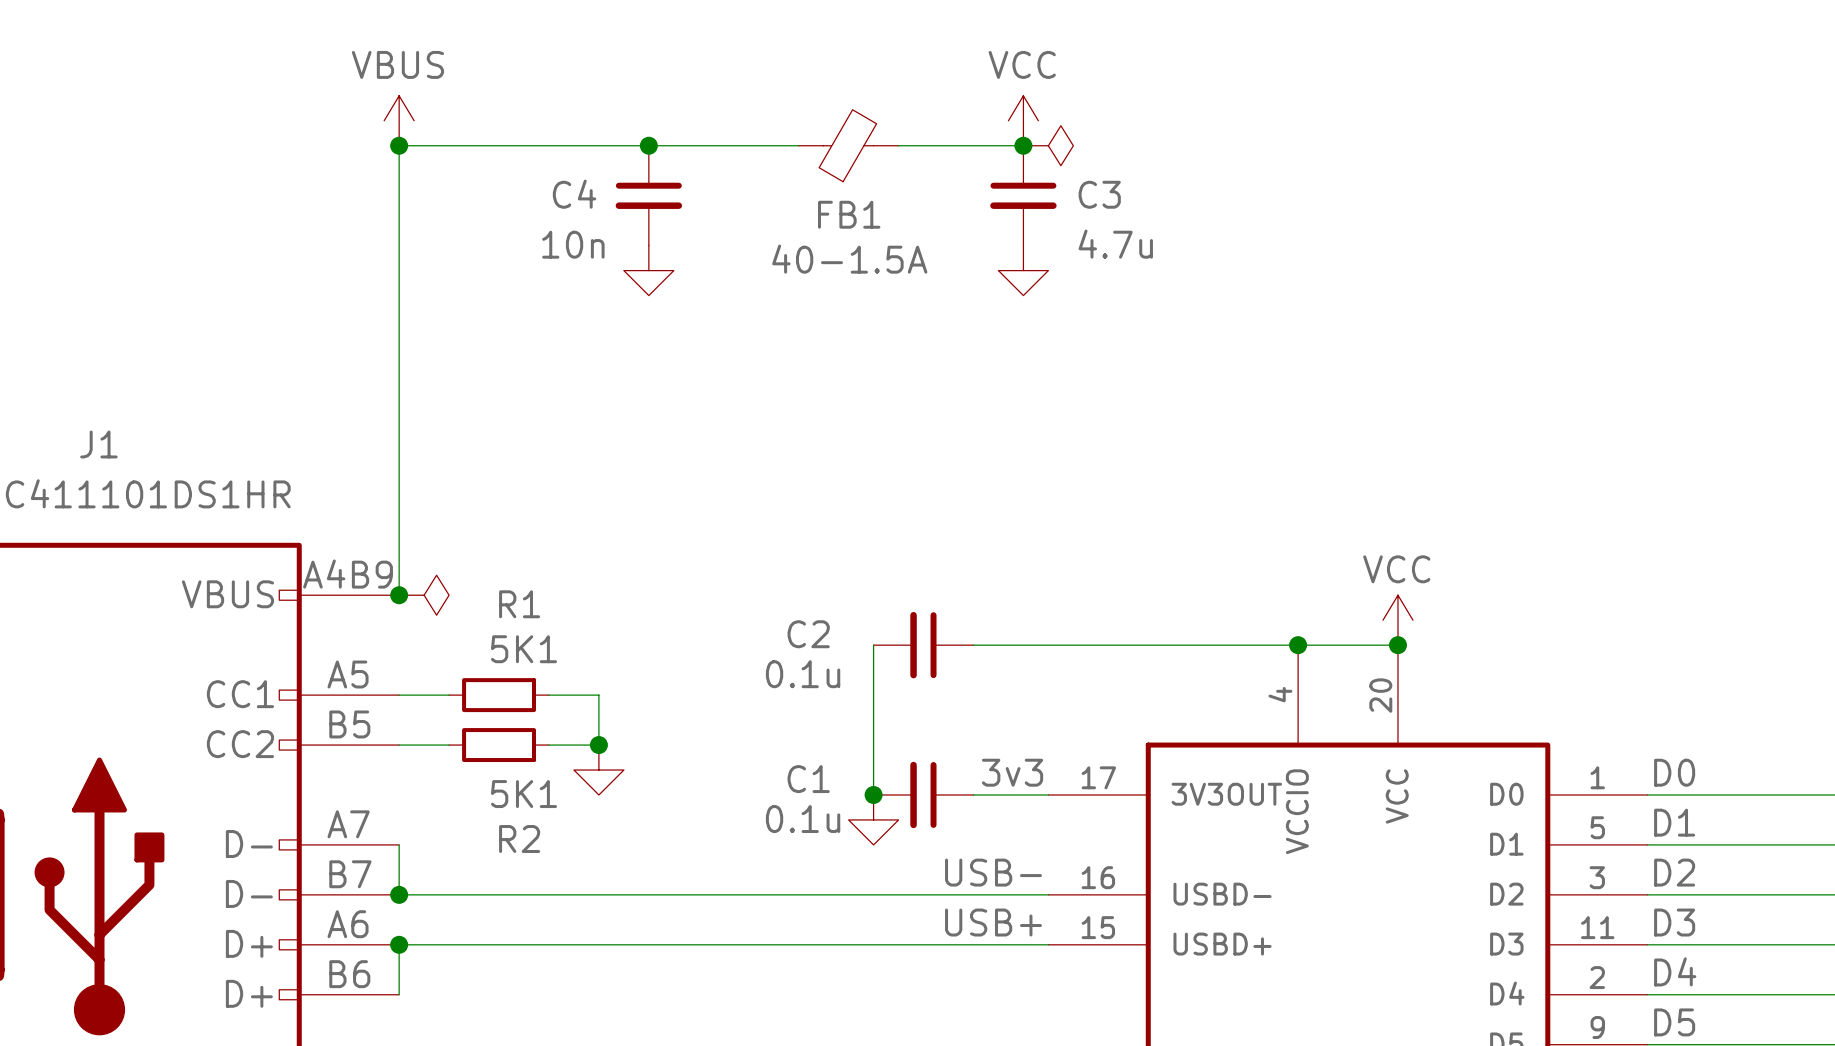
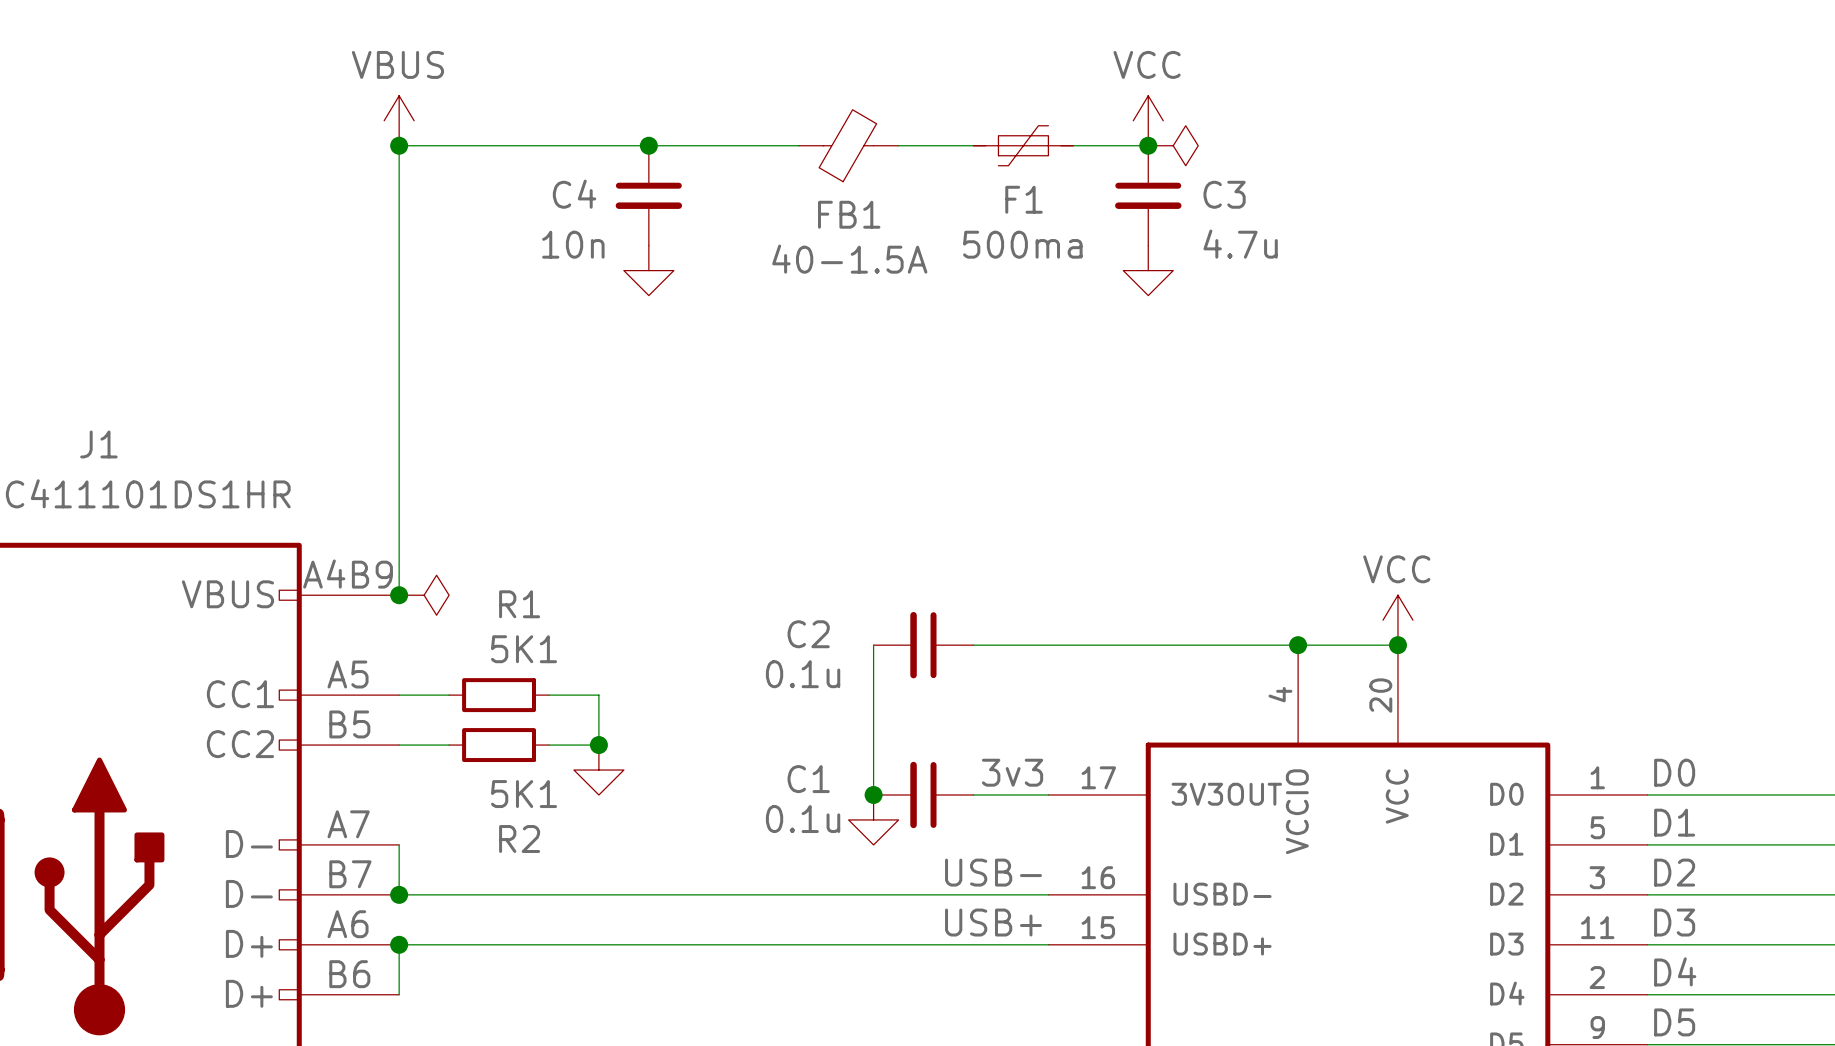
power symbol position: VCC (1023, 120) -> VCC (1148, 120)
junction: (1023, 145) -> none
F1: none -> 500ma (1023, 145)
power symbol position: (1048, 145) -> (1173, 145)
wire: none -> (1073, 145) (1148, 145)
junction: none -> (1148, 145)
C3 position: (1023, 195) -> (1148, 195)
power symbol position: (1023, 270) -> (1148, 270)

